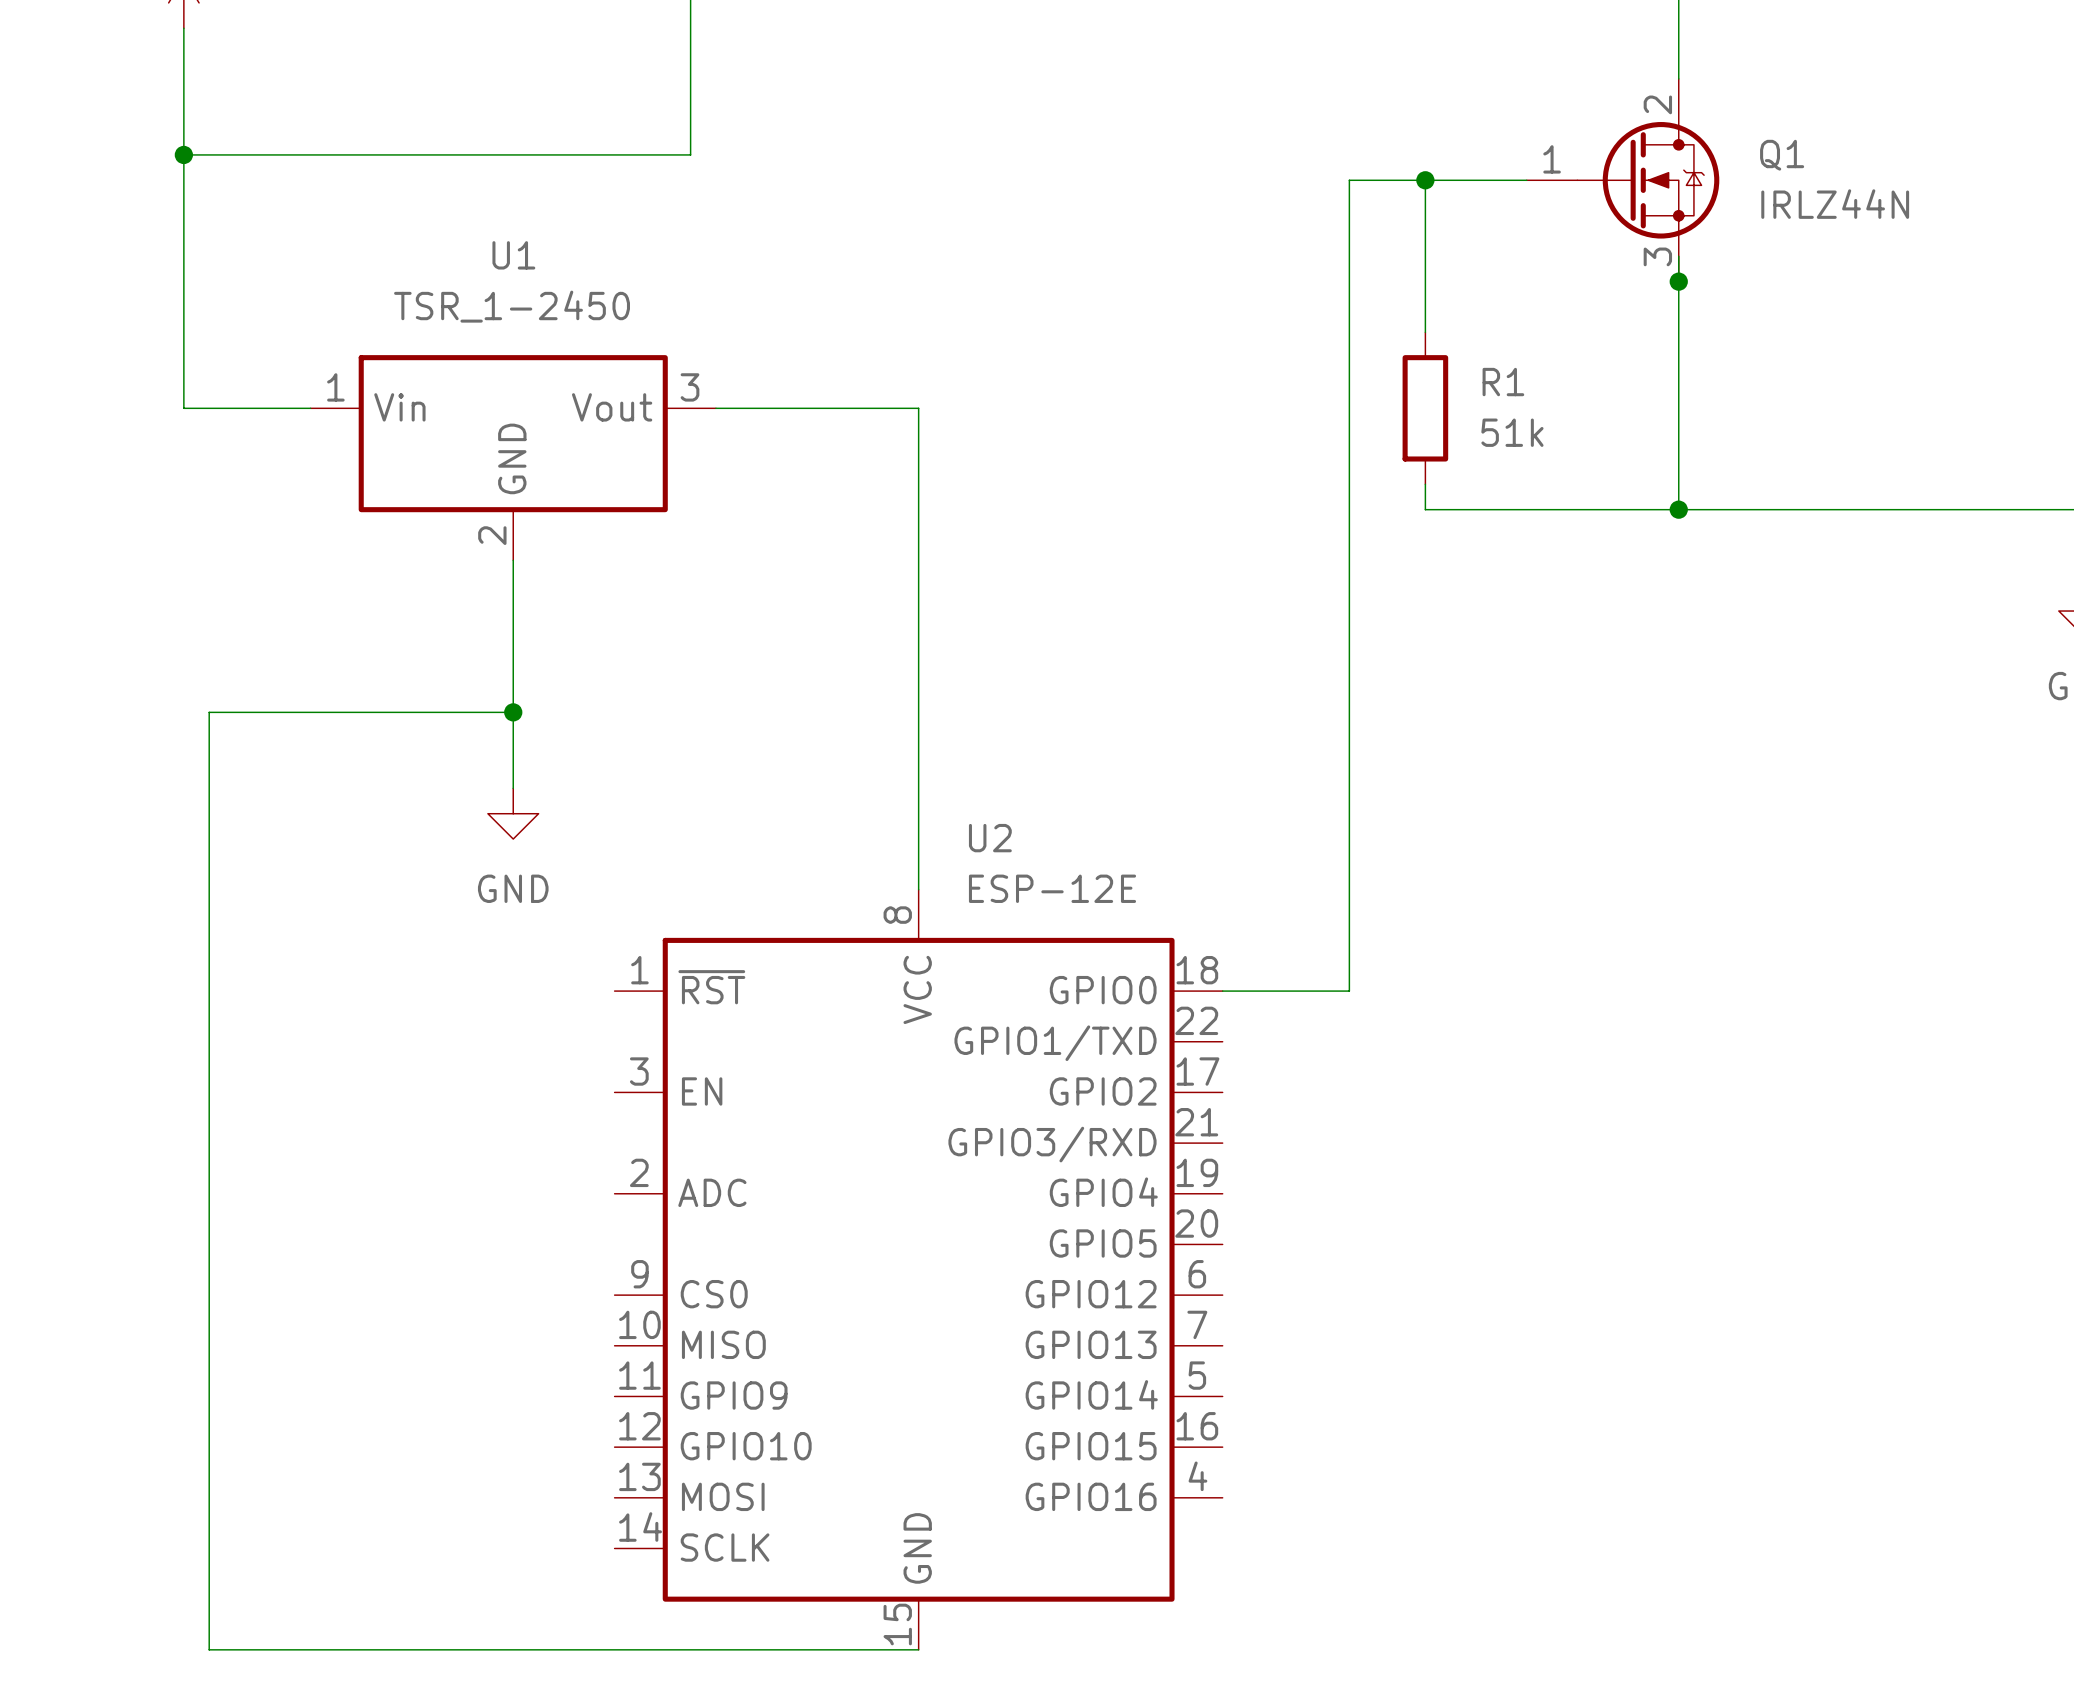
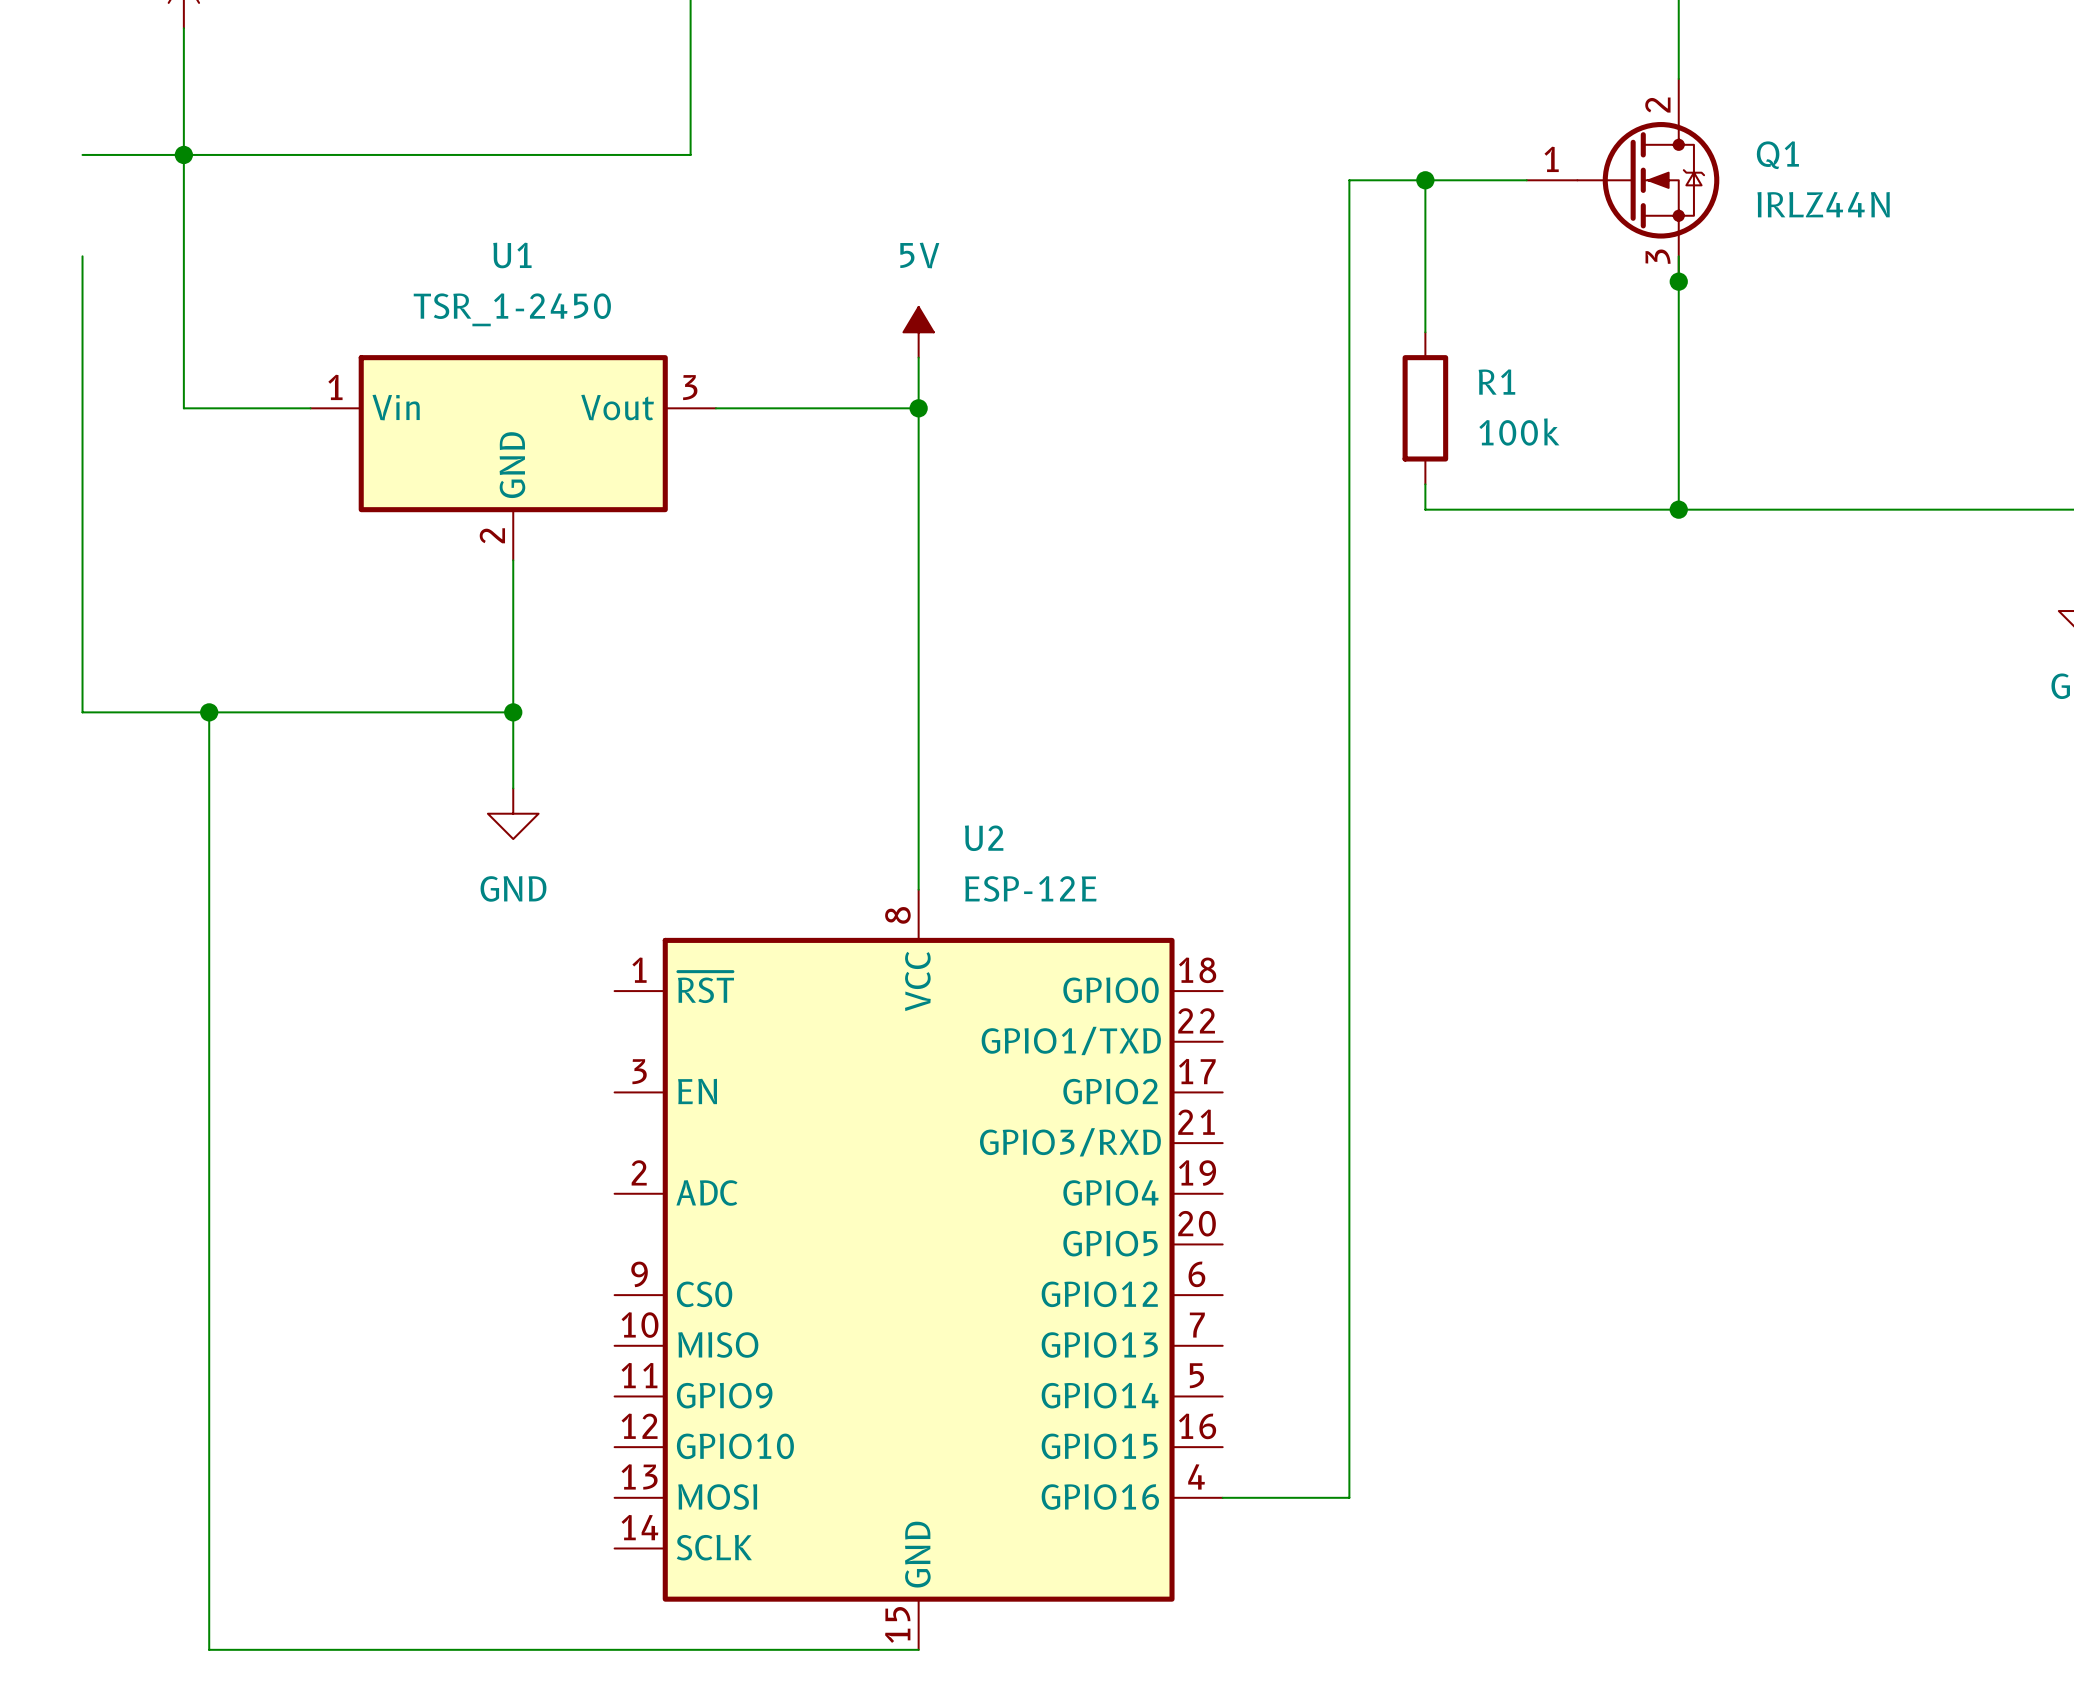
wire: none -> (82, 154) (183, 154)
wire: none -> (82, 256) (82, 712) (209, 712)
power symbol: none -> 5V (918, 332)
wire: none -> (918, 357) (918, 408)
junction: none -> (918, 408)
R1 value: 51k (1512, 432) -> 100k (1519, 432)
junction: none -> (209, 712)
wire: (1222, 991) (1349, 991) -> (1222, 1497) (1349, 1497) (1349, 991)

